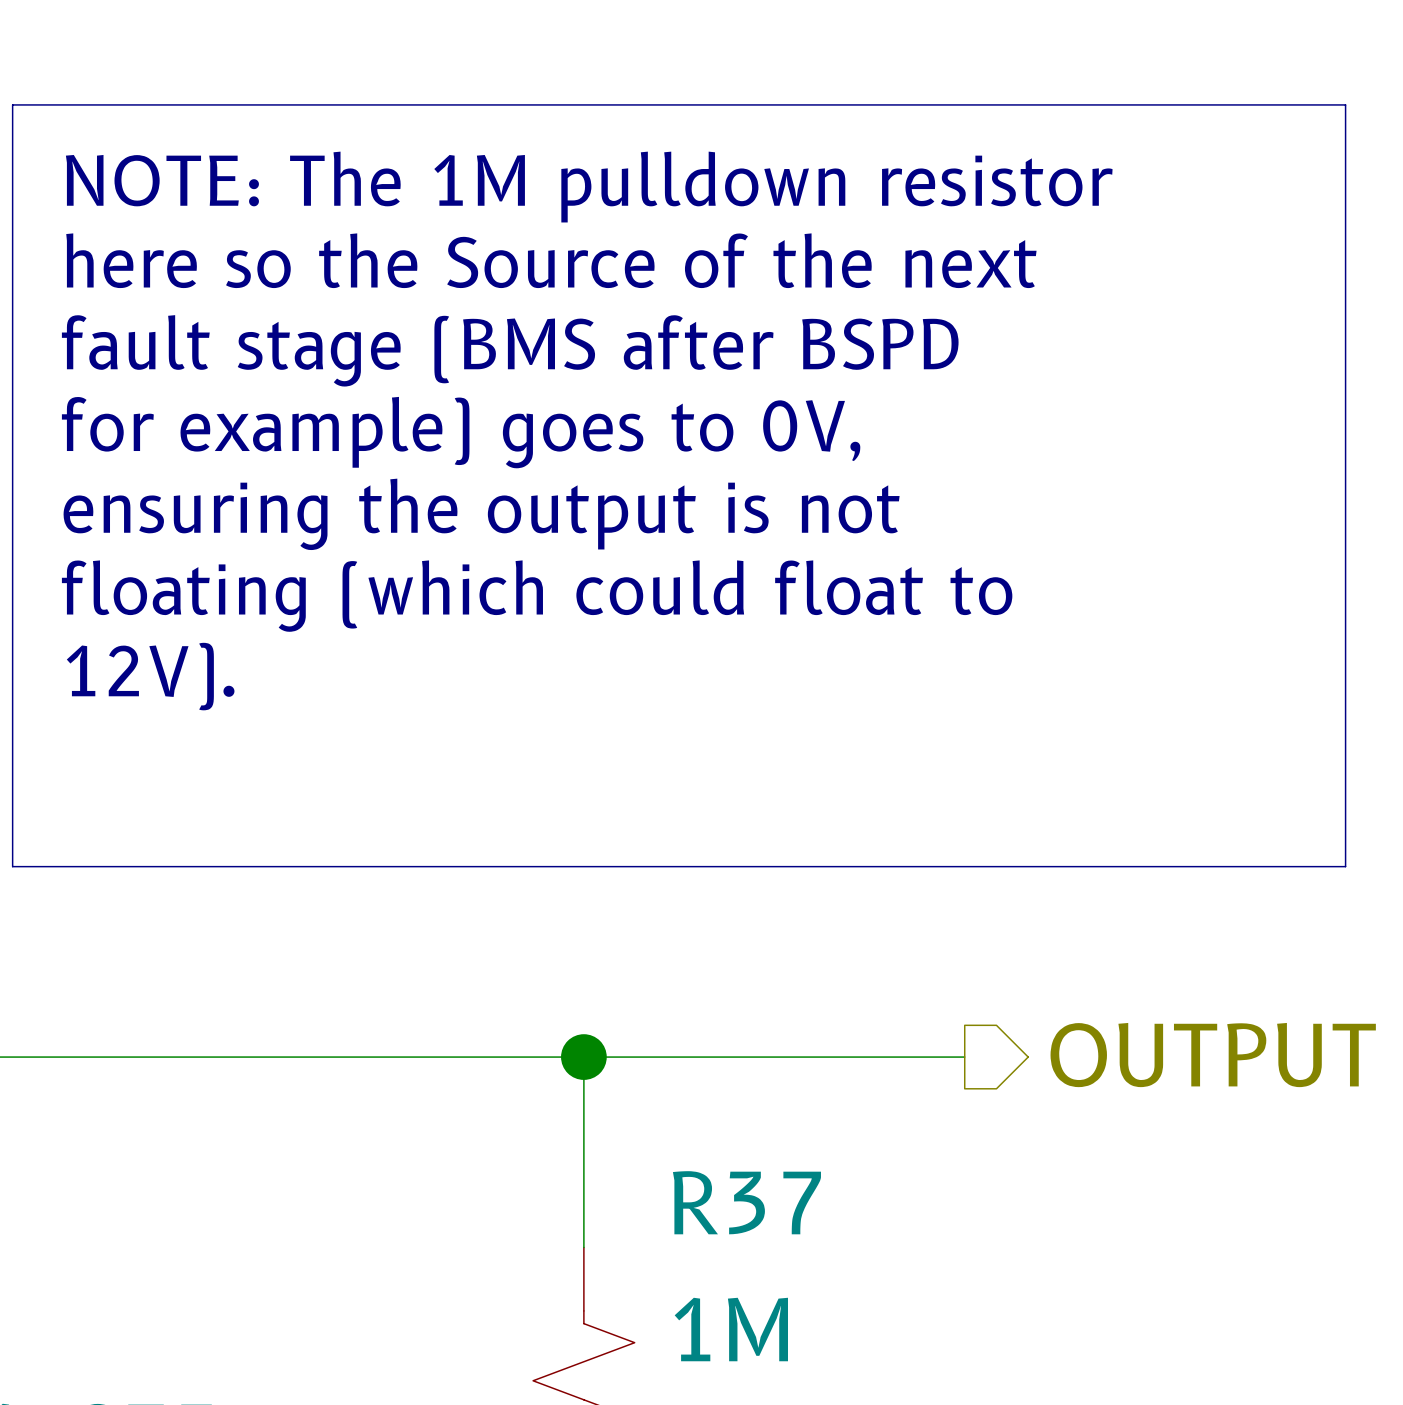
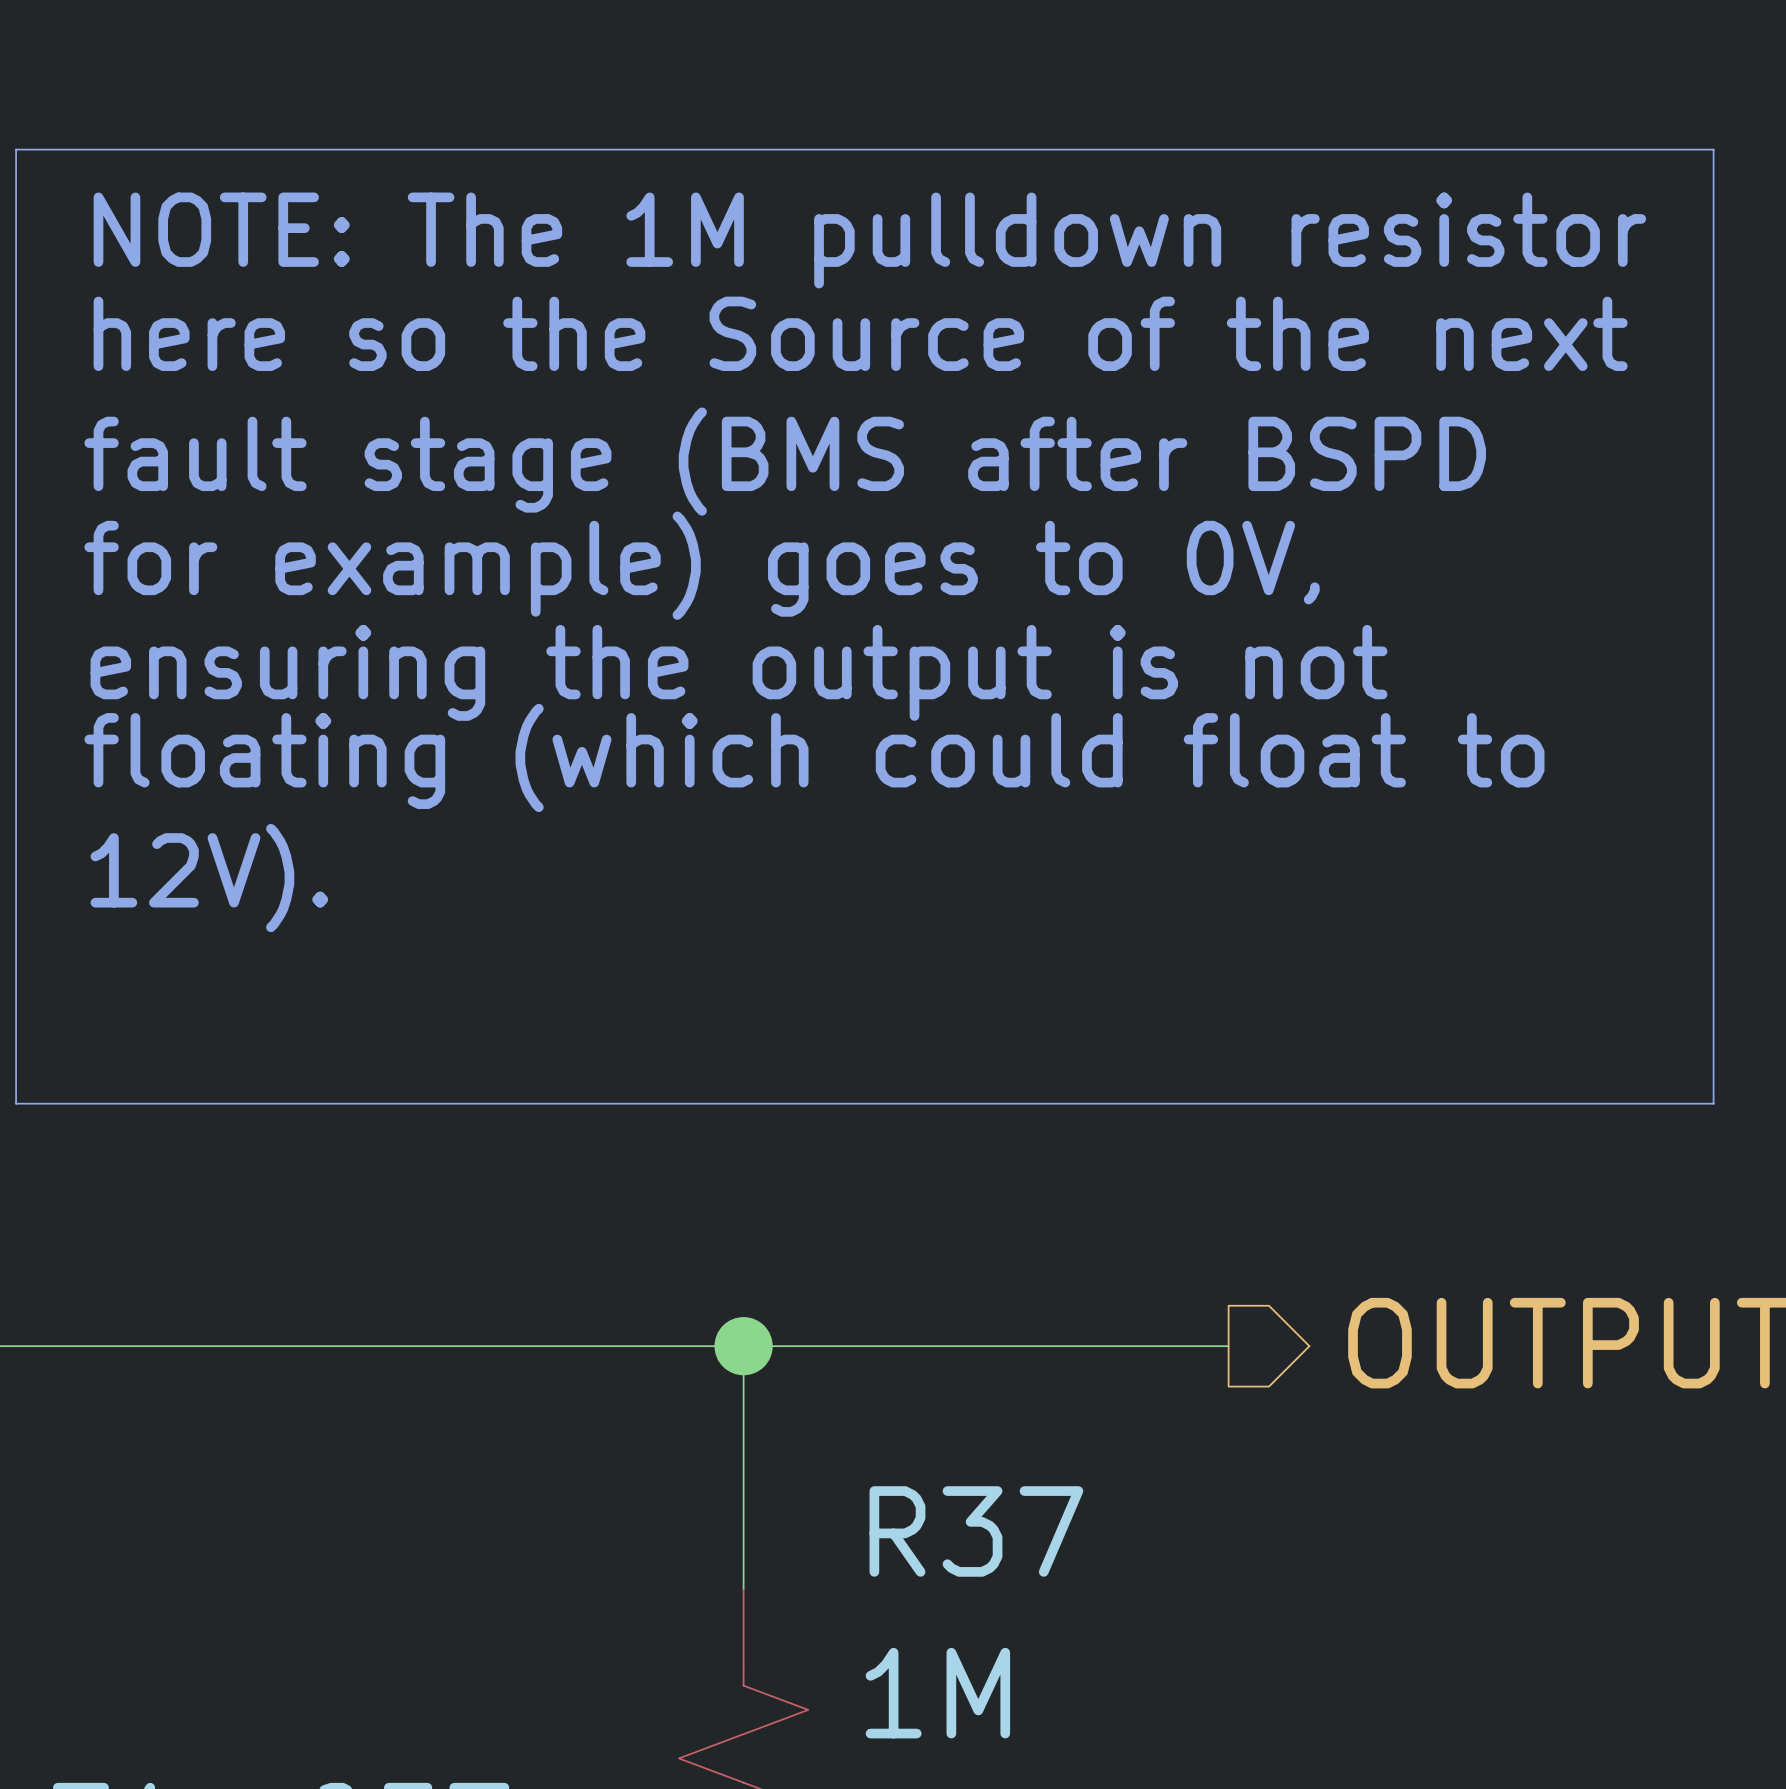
line: (12, 117) (12, 104) (1345, 104) (1345, 117) -> (16, 149) (1713, 149)
text position: fault stage (BMS after BSPD (510, 350) -> fault stage (BMS after BSPD (785, 461)
text position: for example) goes to 0V, (461, 432) -> for example) goes to 0V, (702, 565)
text position: ensuring the output is not (481, 514) -> ensuring the output is not (739, 672)
text position: 12V). (150, 676) -> 12V). (209, 878)

